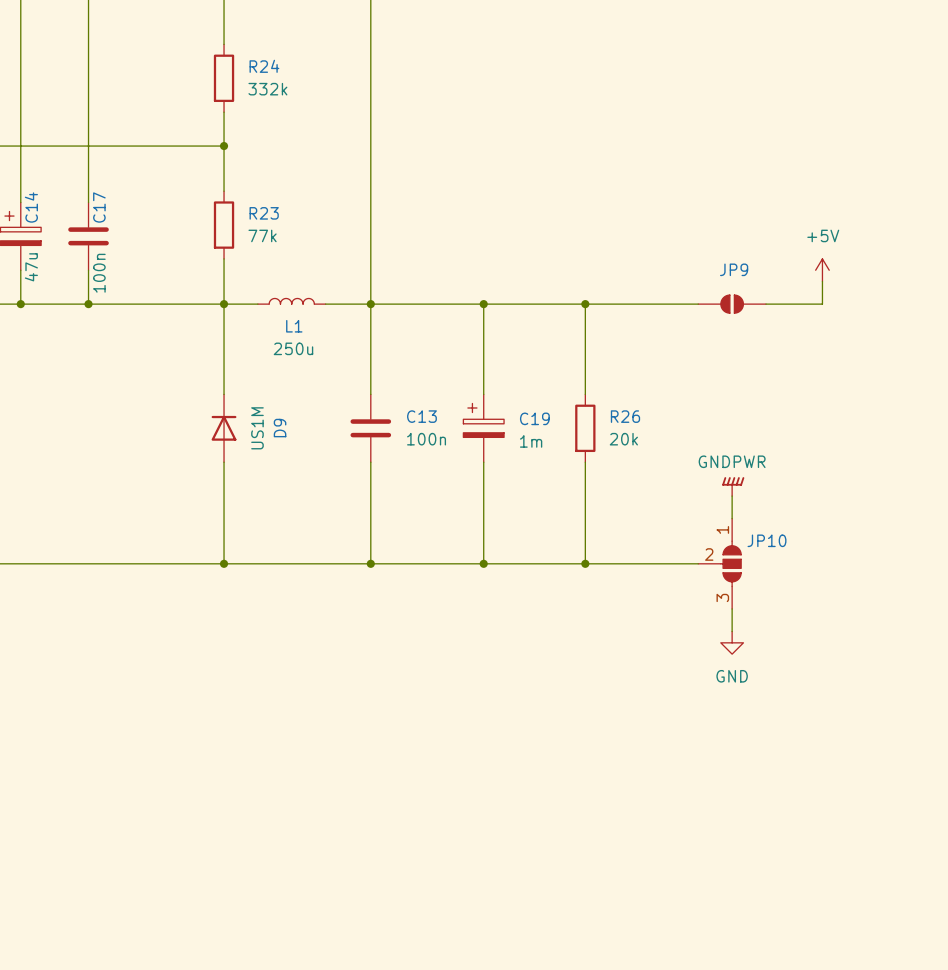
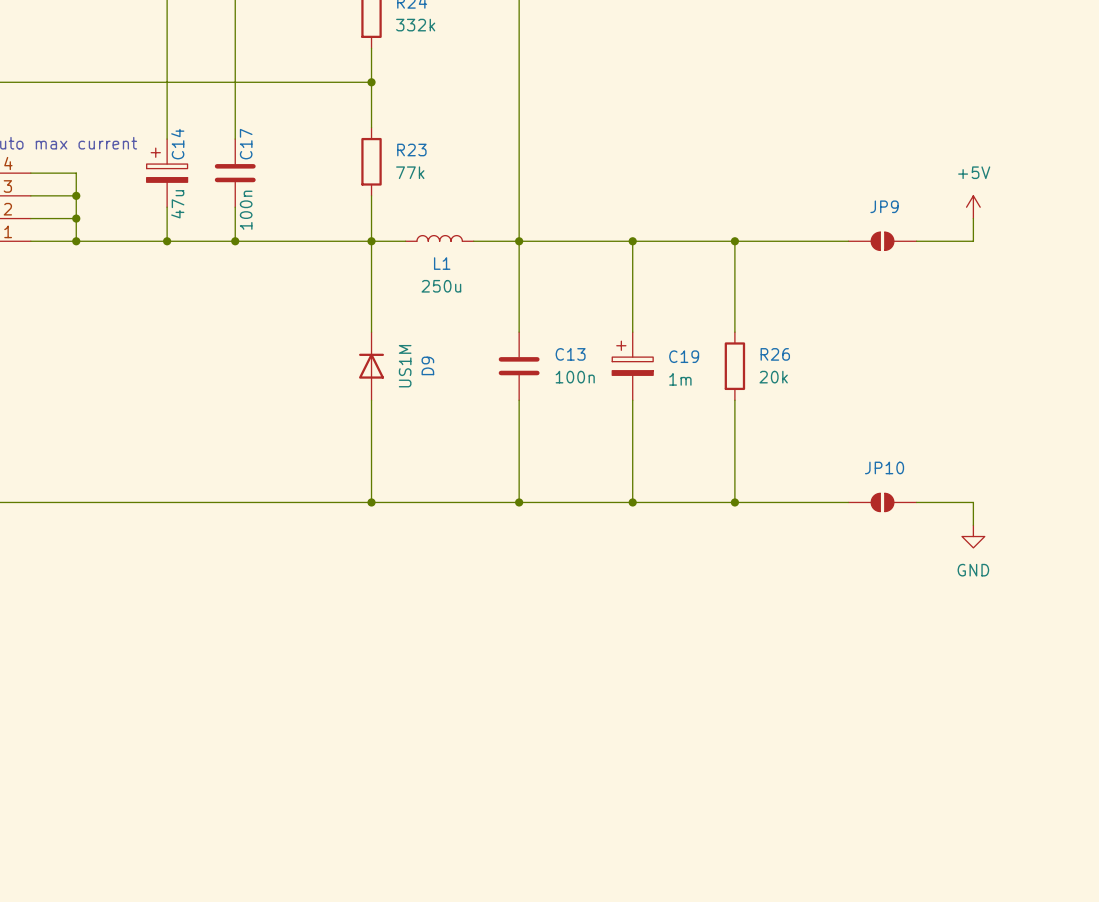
power symbol: GNDPWR (733, 486) -> none
wire: (732, 496) (732, 518) -> none
JP10 symbol: [698, 518, 742, 609] -> [848, 493, 917, 512]
JP10 name position: JP10 (766, 540) -> JP10 (884, 467)
wire: none -> (916, 502) (973, 502) (973, 525)
wire: (732, 608) (732, 631) -> none
power symbol position: GND (732, 642) -> GND (973, 536)

